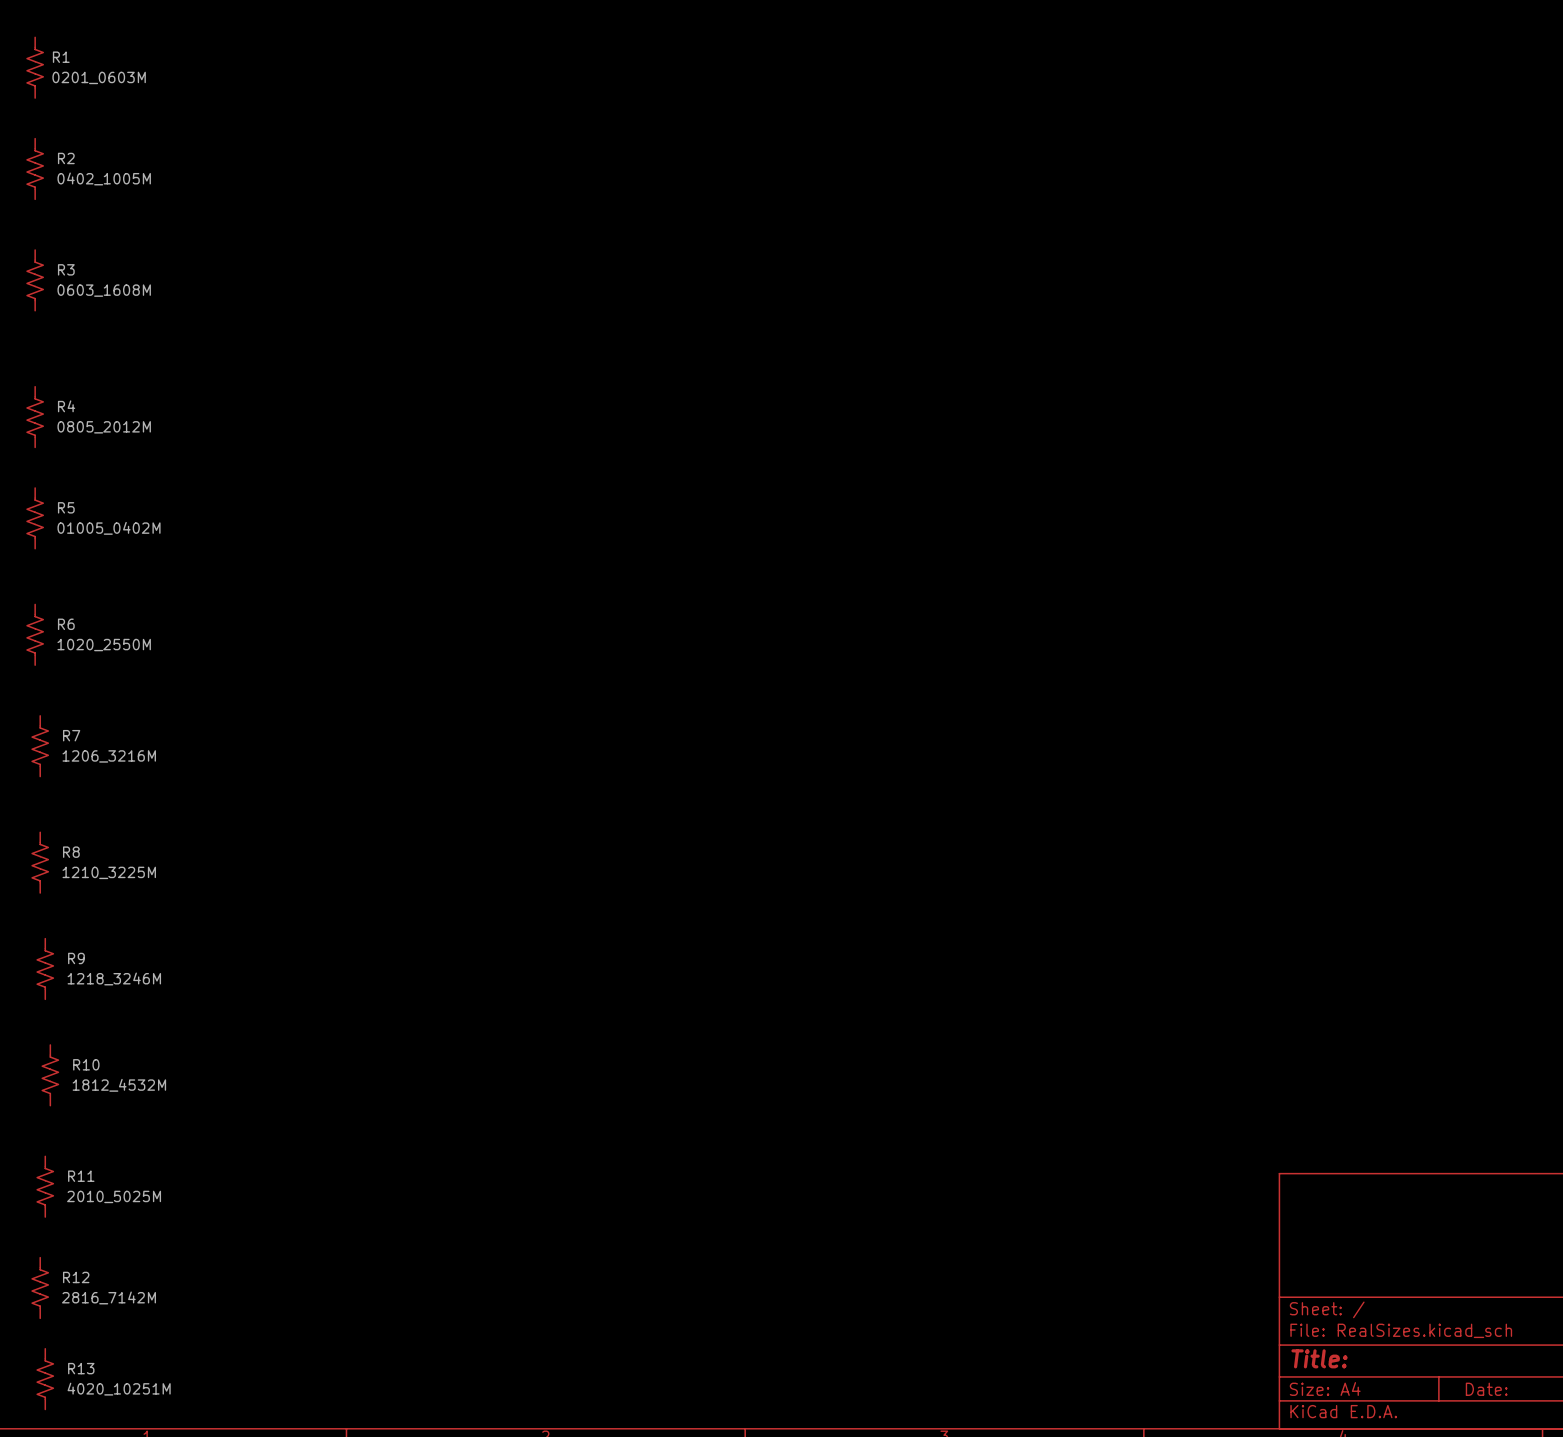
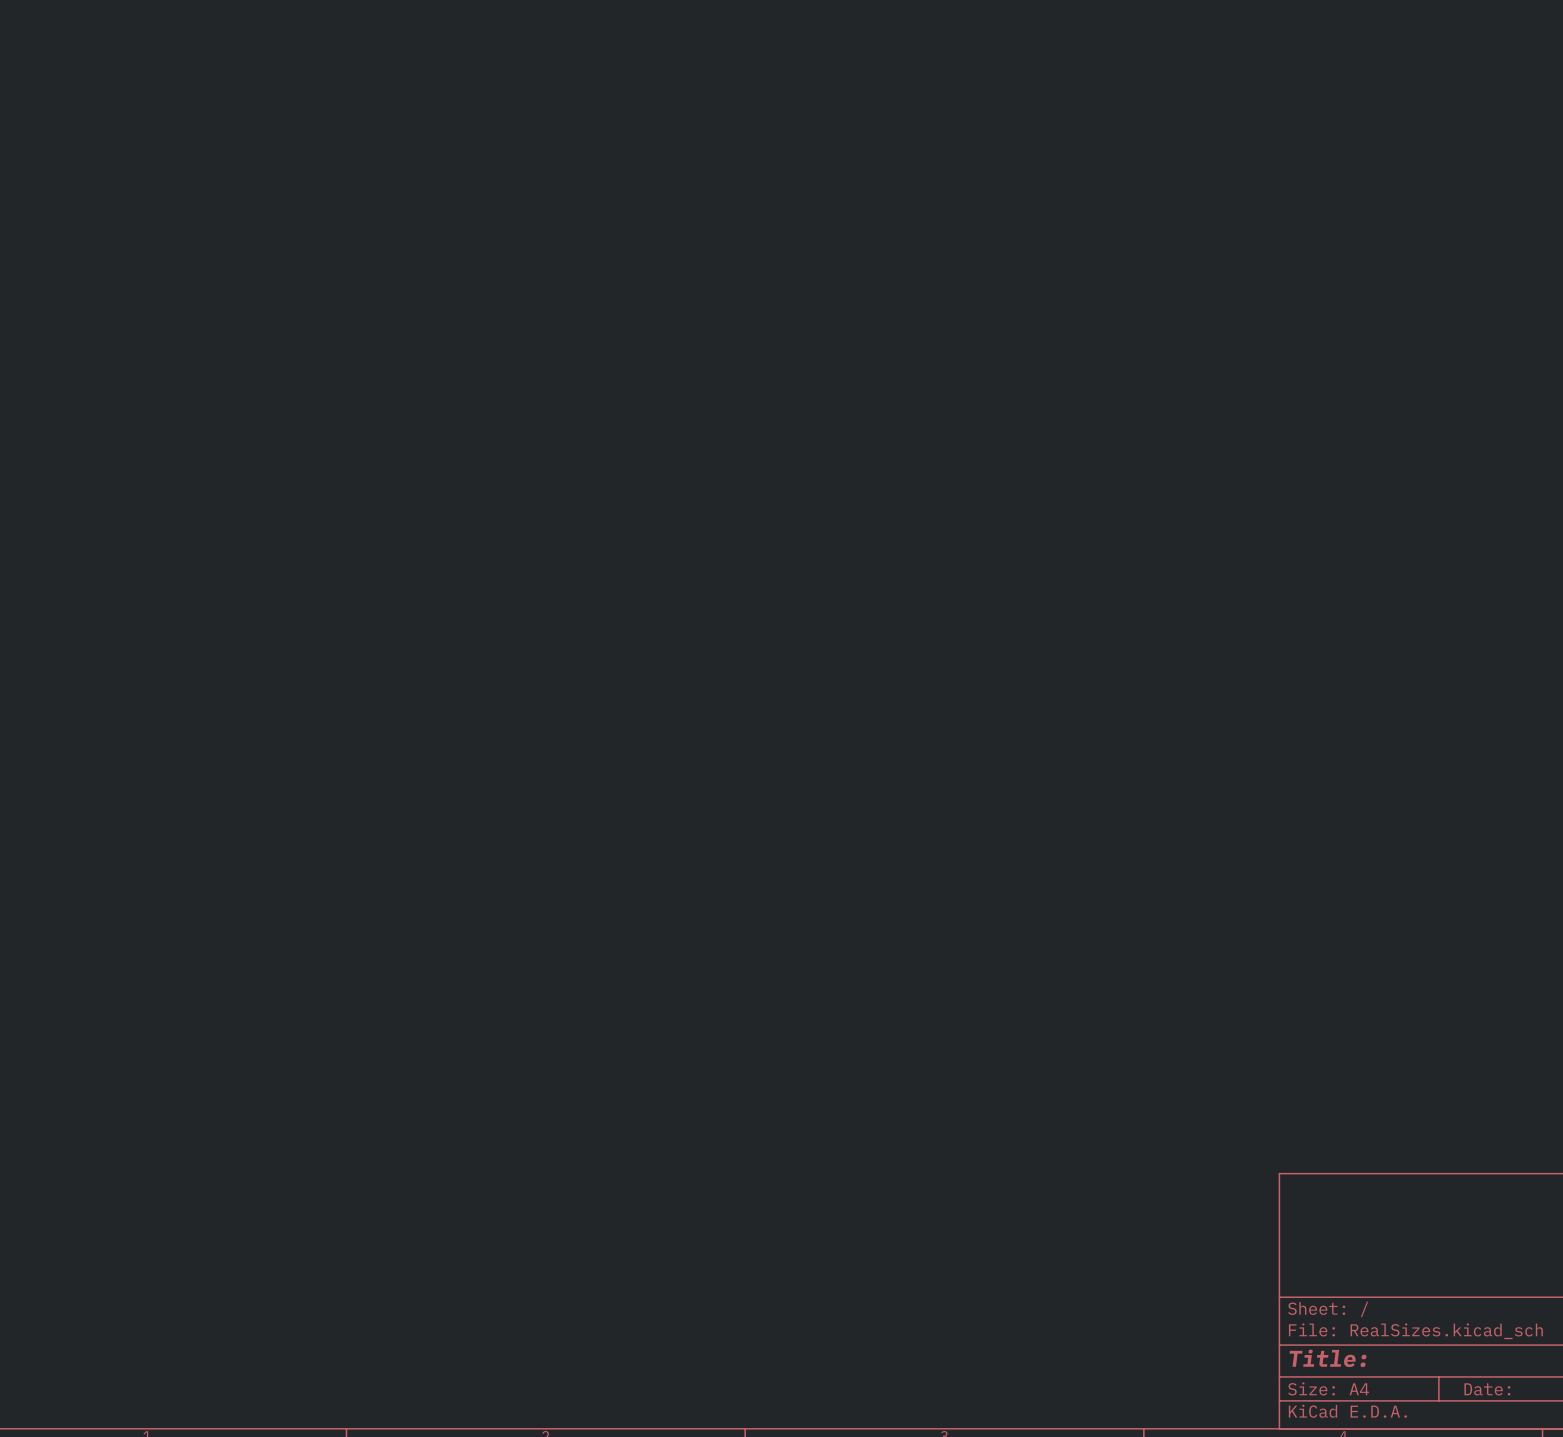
R1: 0201_0603M (35, 67) -> none
R2: 0402_1005M (35, 168) -> none
R3: 0603_1608M (35, 280) -> none
R4: 0805_2012M (35, 417) -> none
R5: 01005_0402M (35, 518) -> none
R6: 1020_2550M (35, 634) -> none
R7: 1206_3216M (40, 746) -> none
R8: 1210_3225M (40, 862) -> none
R9: 1218_3246M (45, 968) -> none
R10: 1812_4532M (50, 1075) -> none
R11: 2010_5025M (45, 1186) -> none
R12: 2816_7142M (40, 1287) -> none
R13: 4020_10251M (45, 1379) -> none

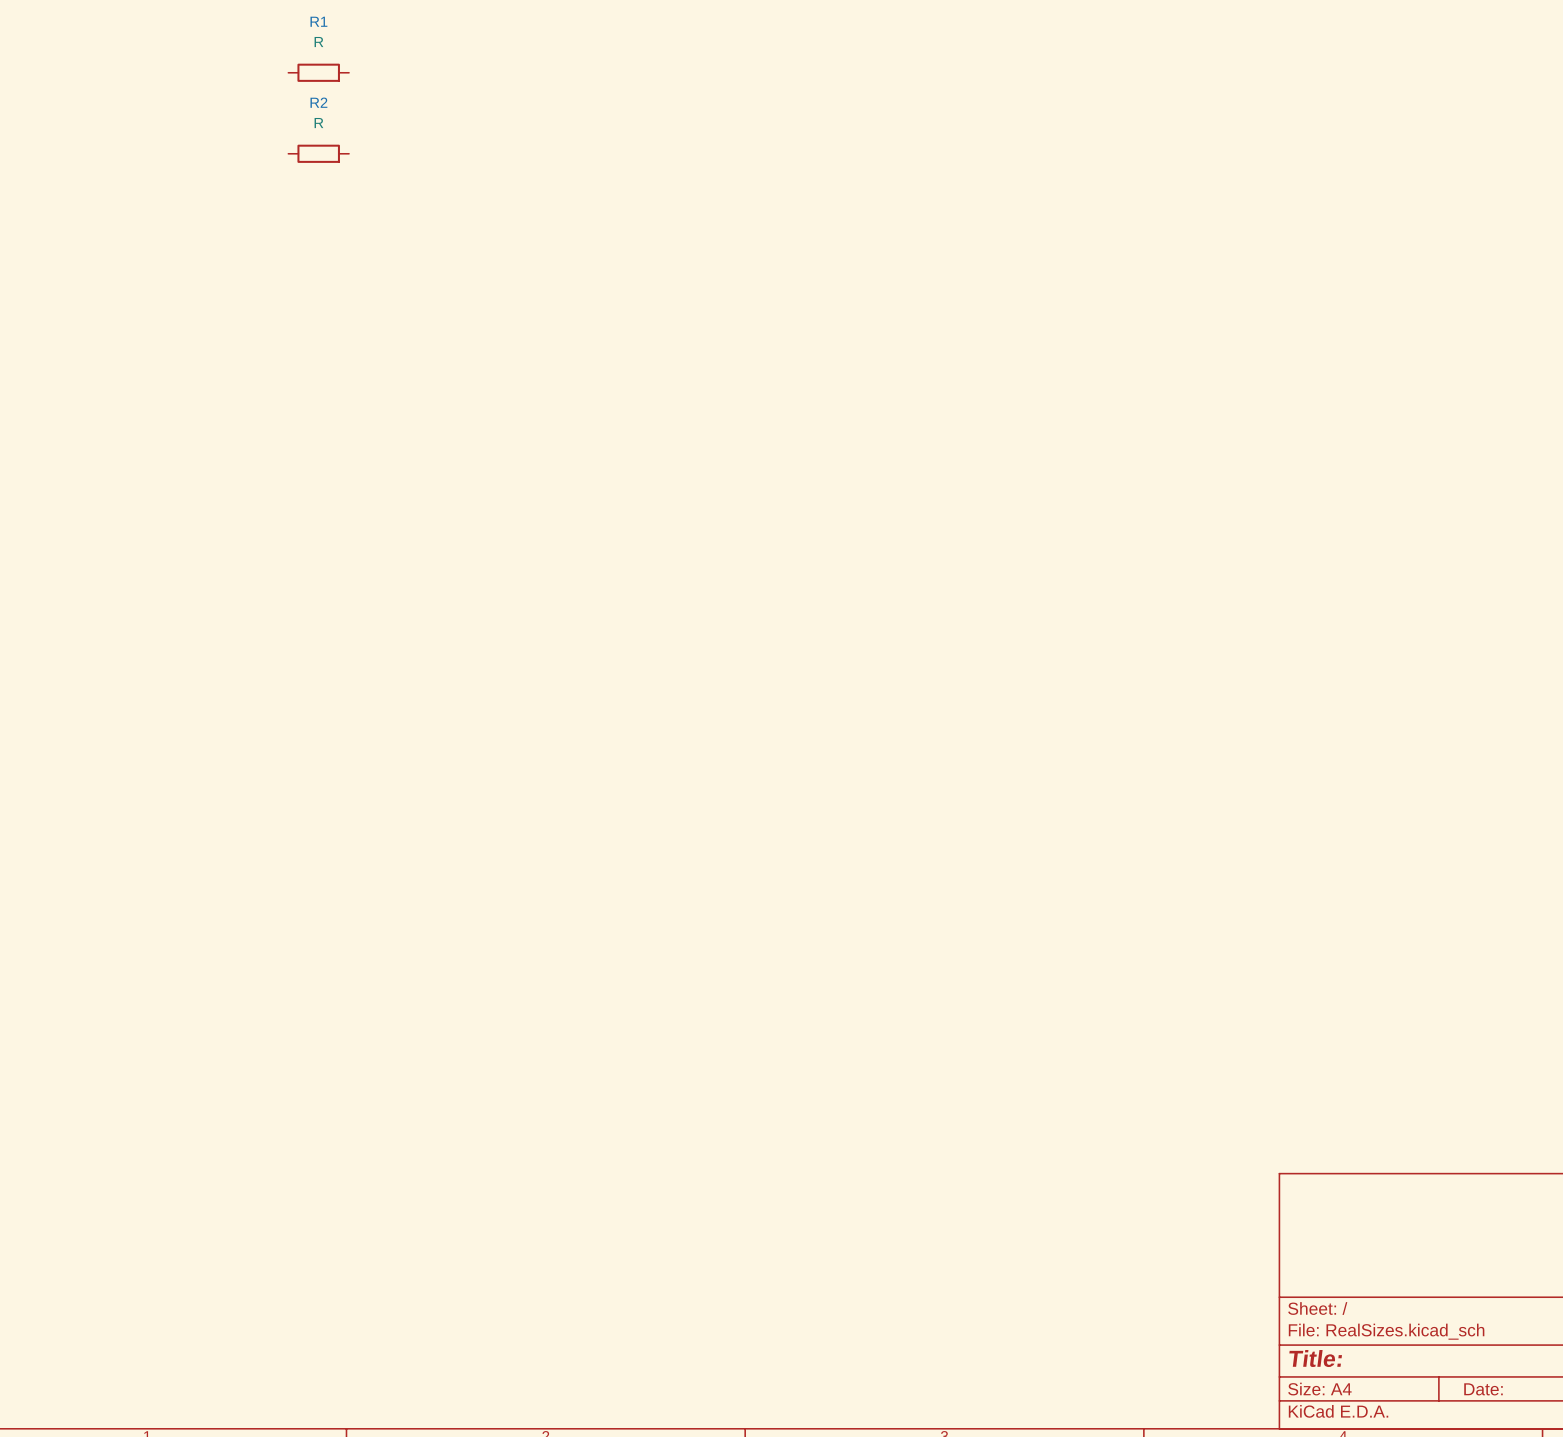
R1: none -> R (318, 72)
R2: none -> R (318, 153)

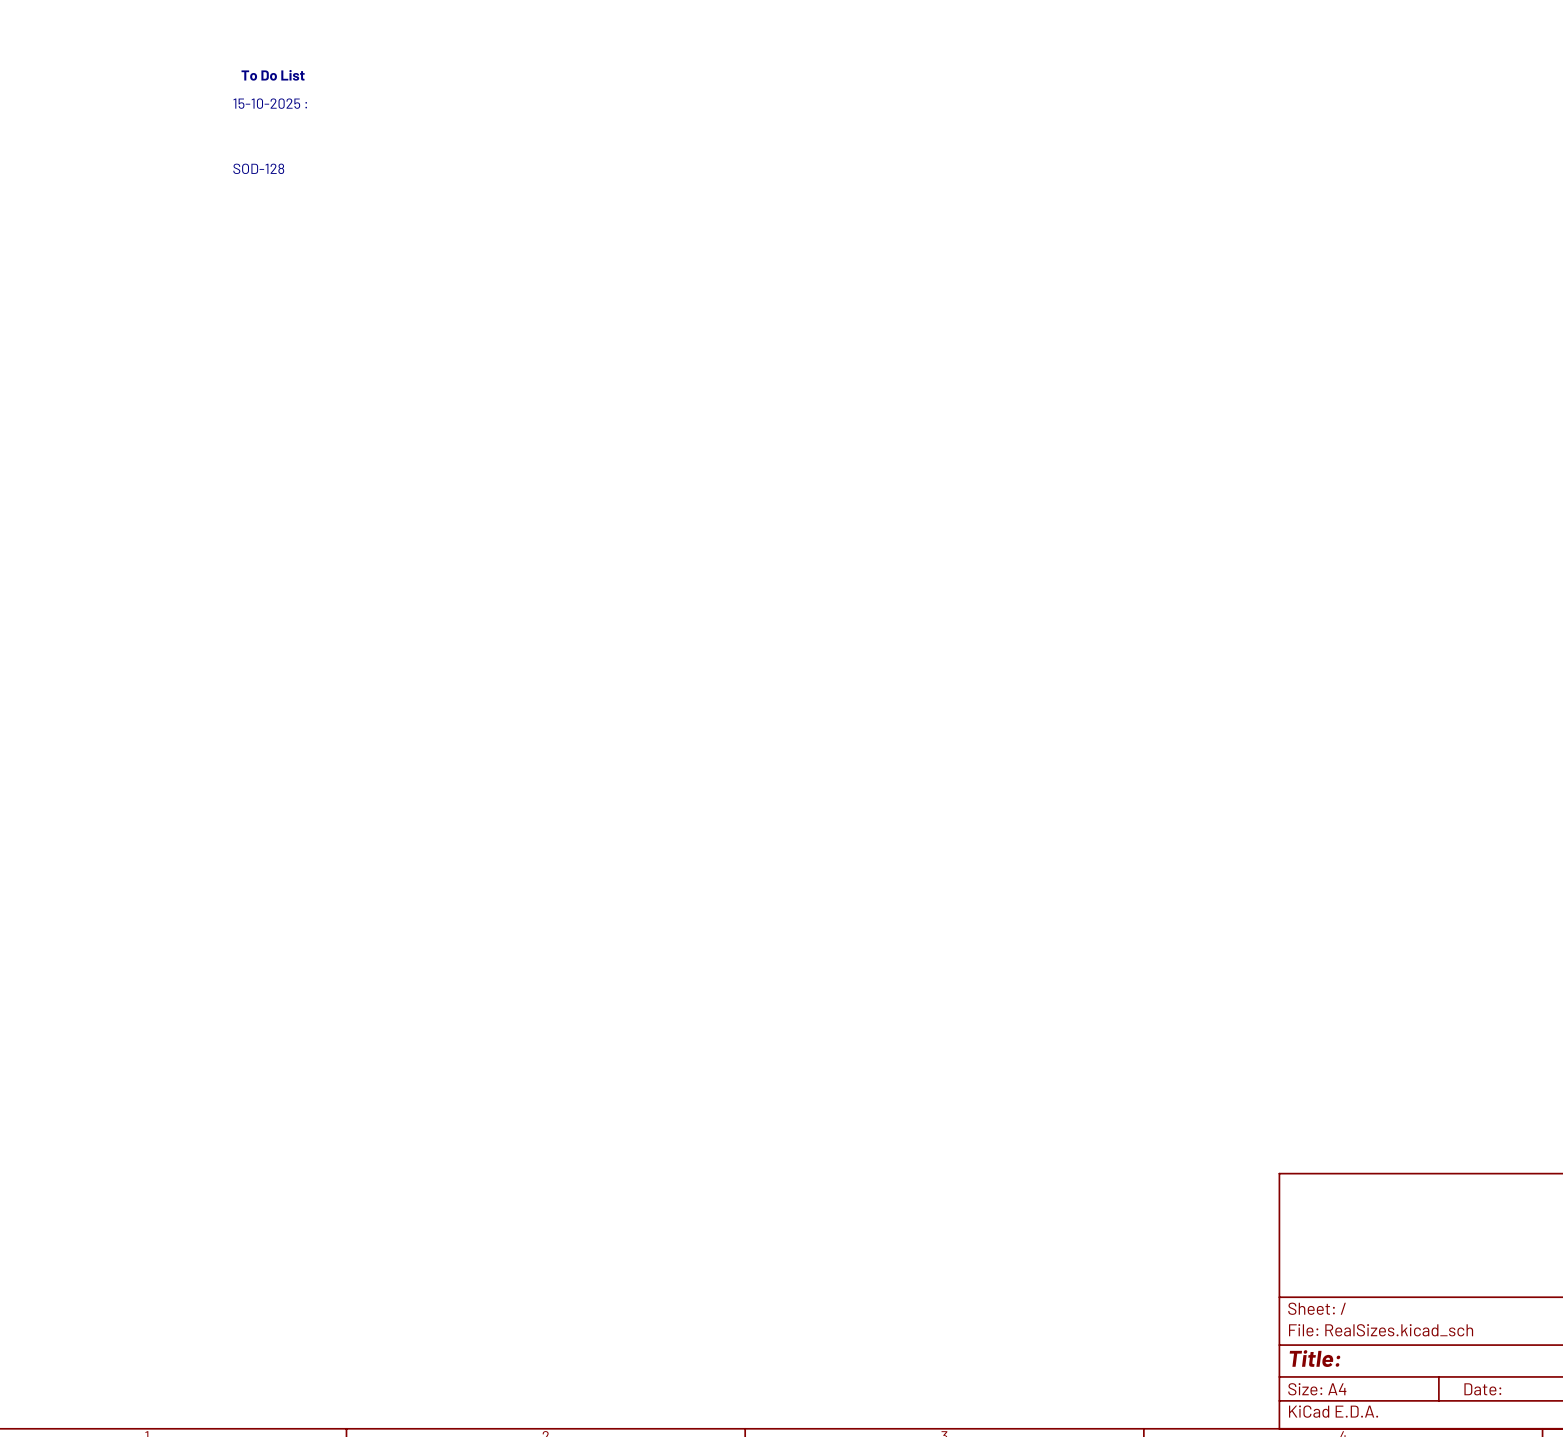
R1: R (318, 72) -> none
text: none -> To Do List (273, 75)
text: none -> 15-10-2025 : (270, 103)
R2: R (318, 153) -> none
text: none -> SOD-128 (258, 168)

